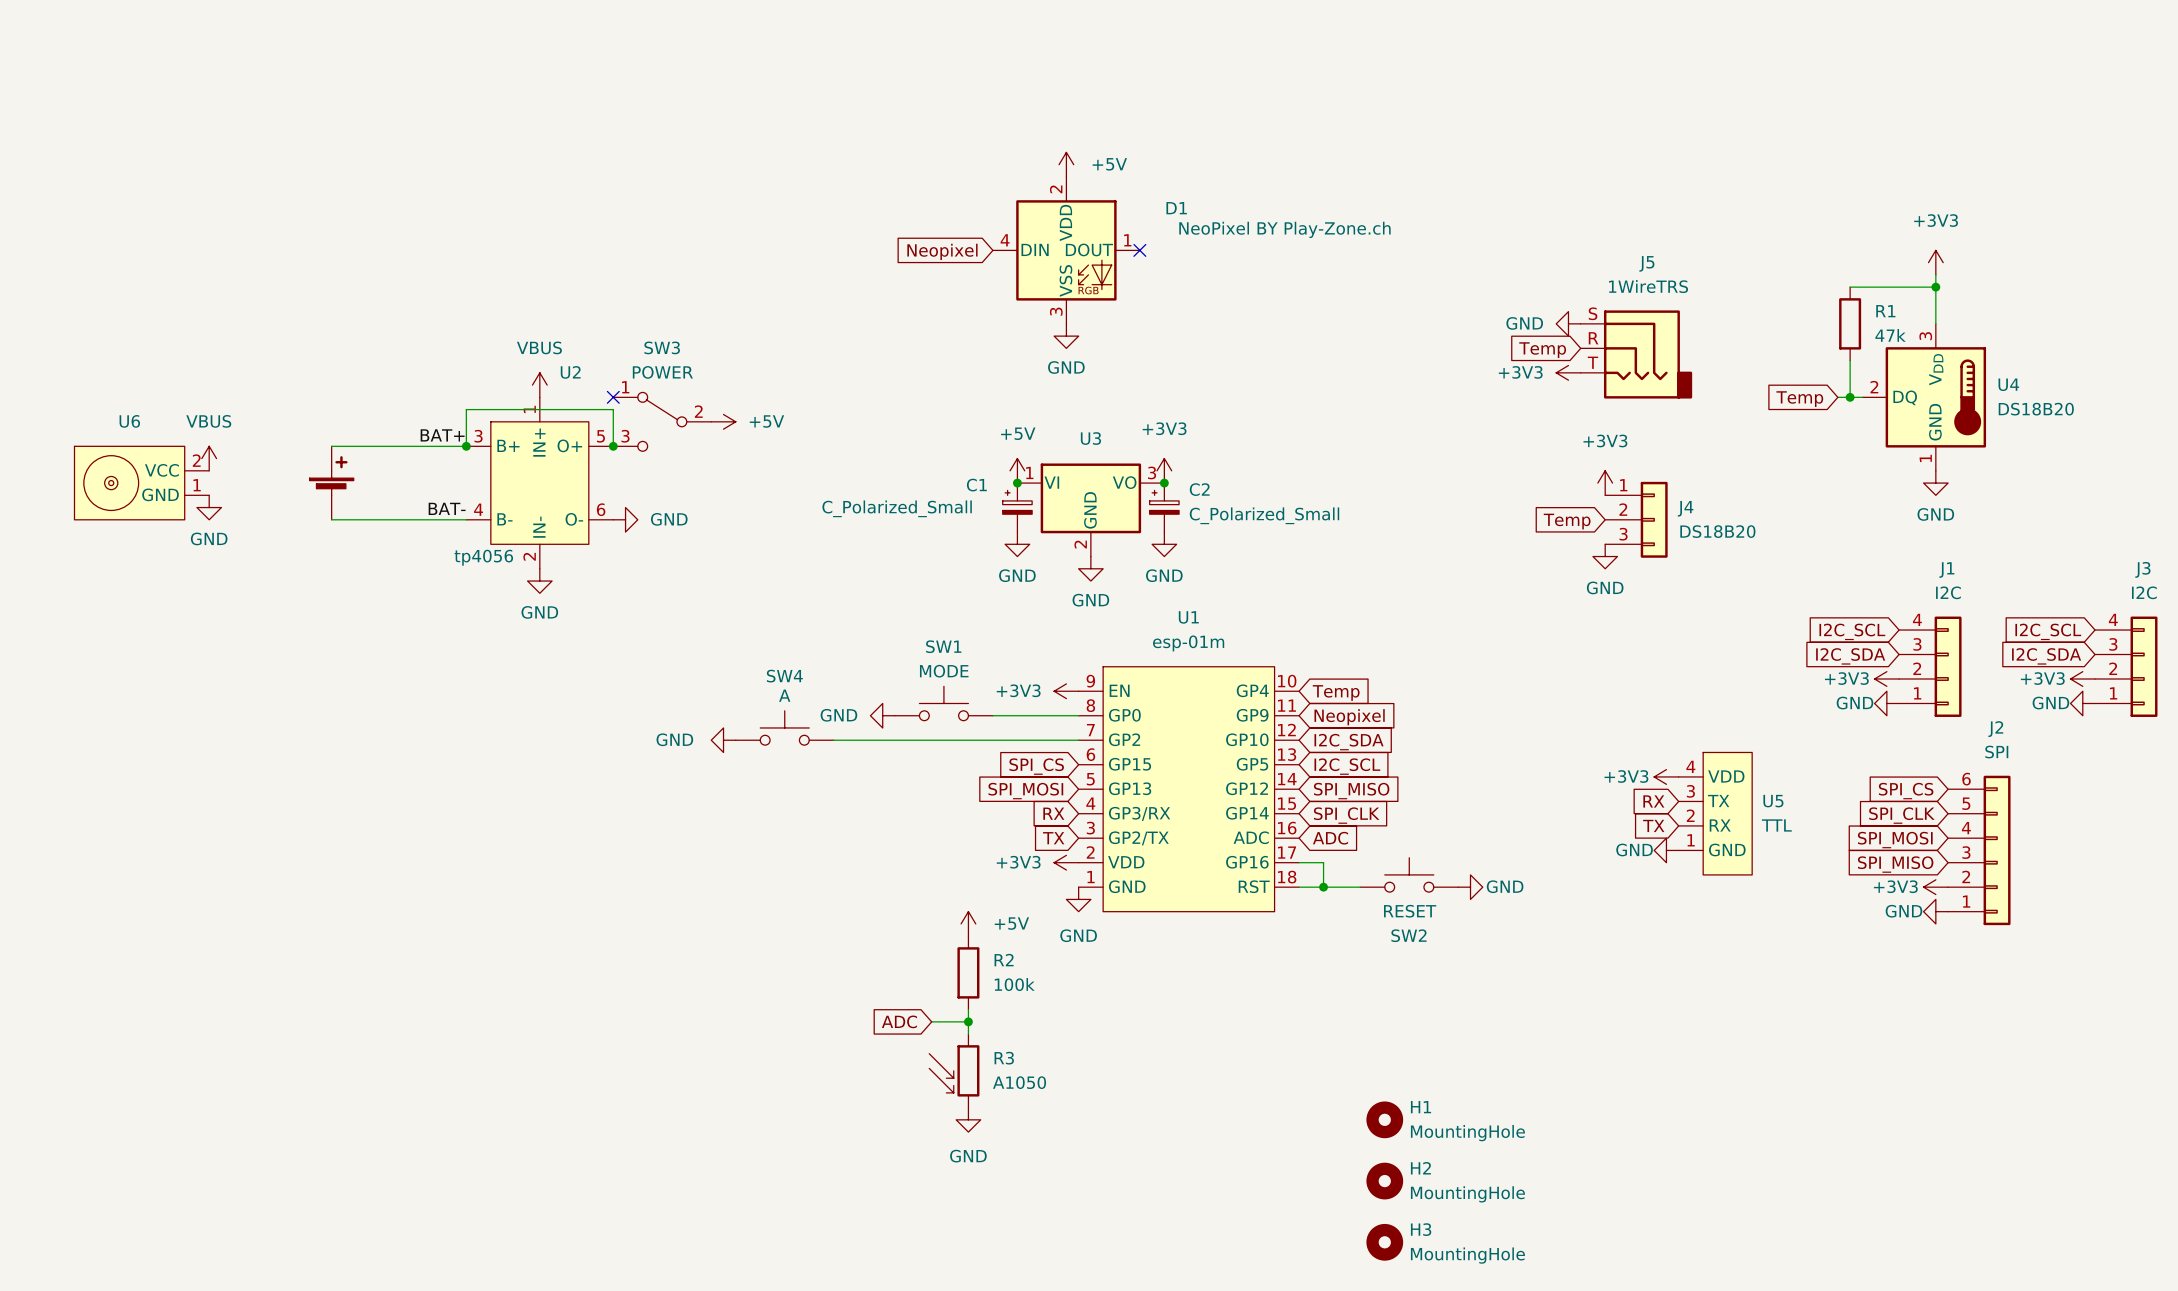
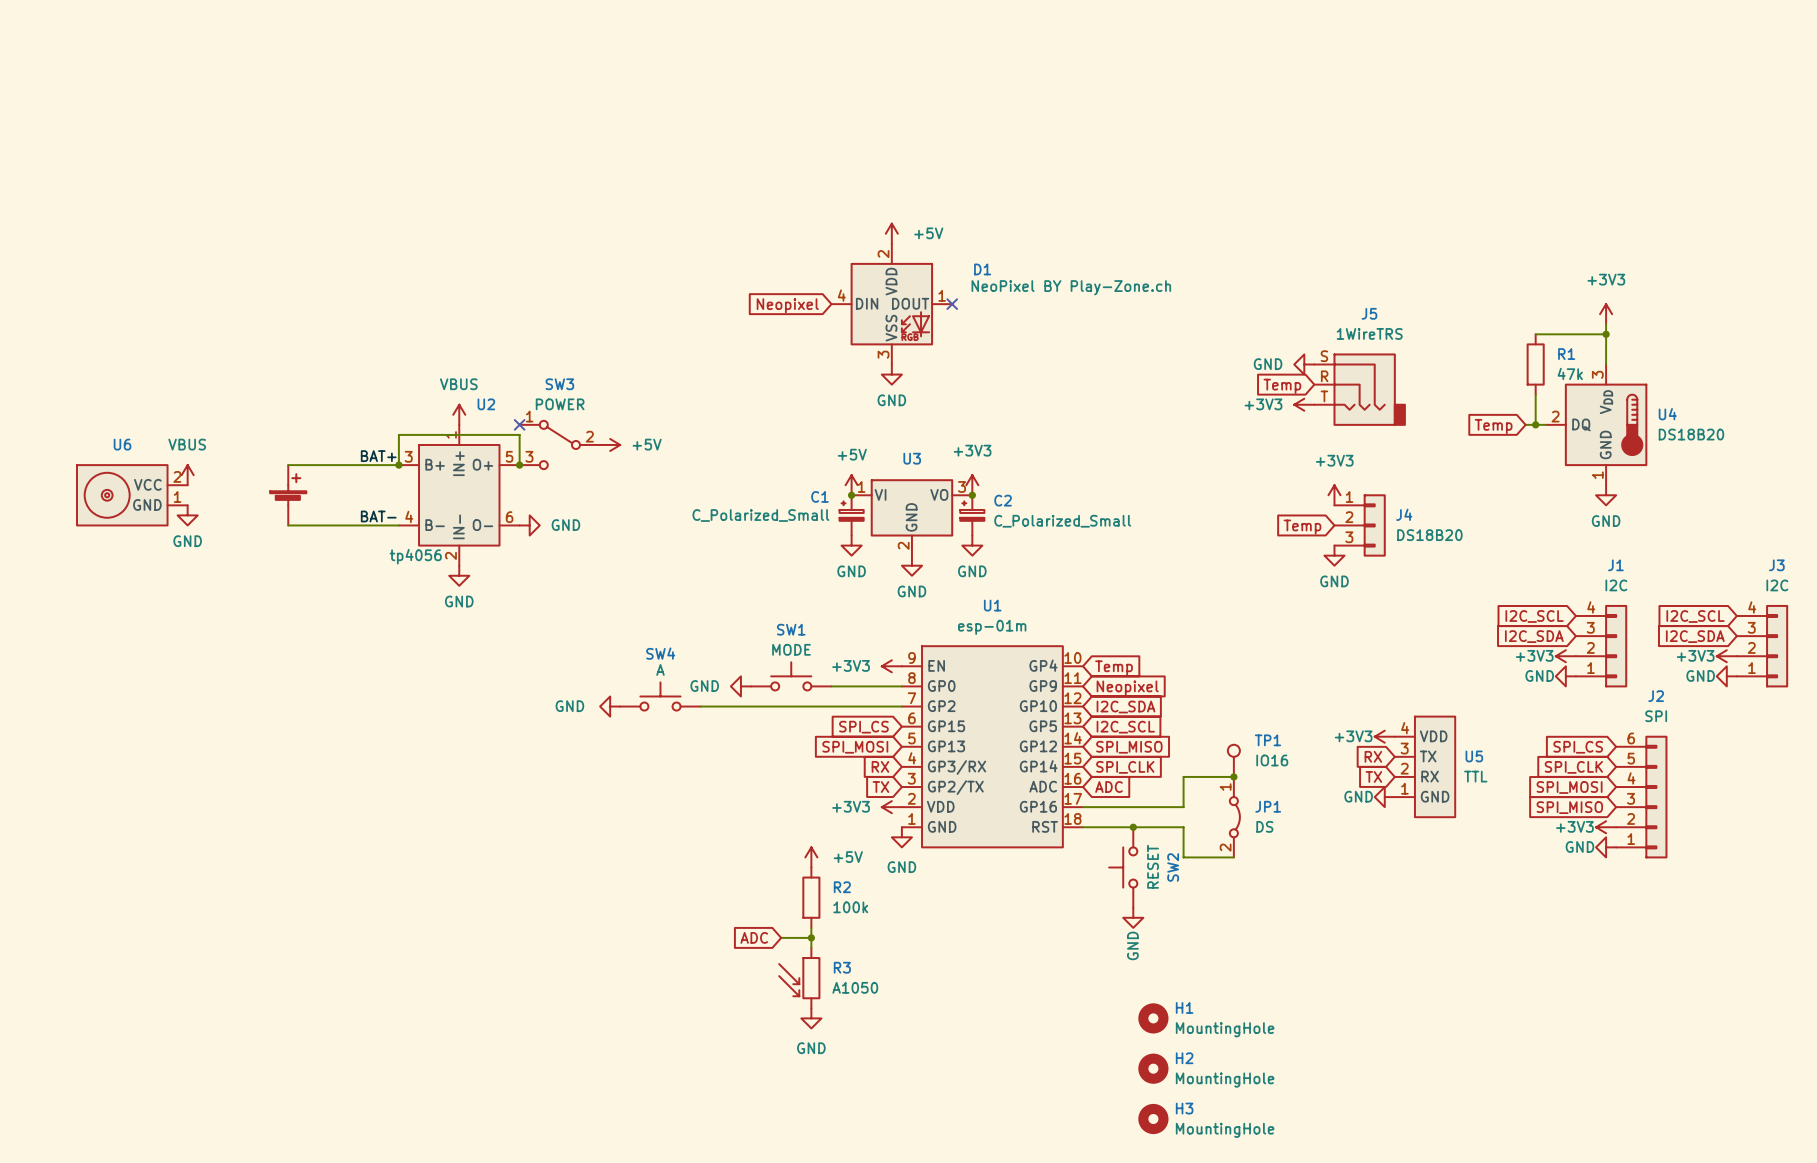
TP1: none -> IO16 (1233, 760)
junction: none -> (1233, 776)
wire: (1323, 862) (1323, 887) -> (1103, 807) (1183, 807) (1183, 776) (1233, 776)
SW2 rotation: 0° (1409, 874) -> 90° counterclockwise (1123, 867)
SW2 position: (1409, 874) -> (1123, 867)
JP1: none -> DS (1234, 817)
junction position: (1323, 887) -> (1133, 827)
wire: none -> (1133, 827) (1183, 827) (1183, 857) (1233, 857)
power symbol rotation: 0° (1470, 887) -> 90° clockwise (1133, 917)
power symbol position: GND (1470, 887) -> GND (1133, 917)

